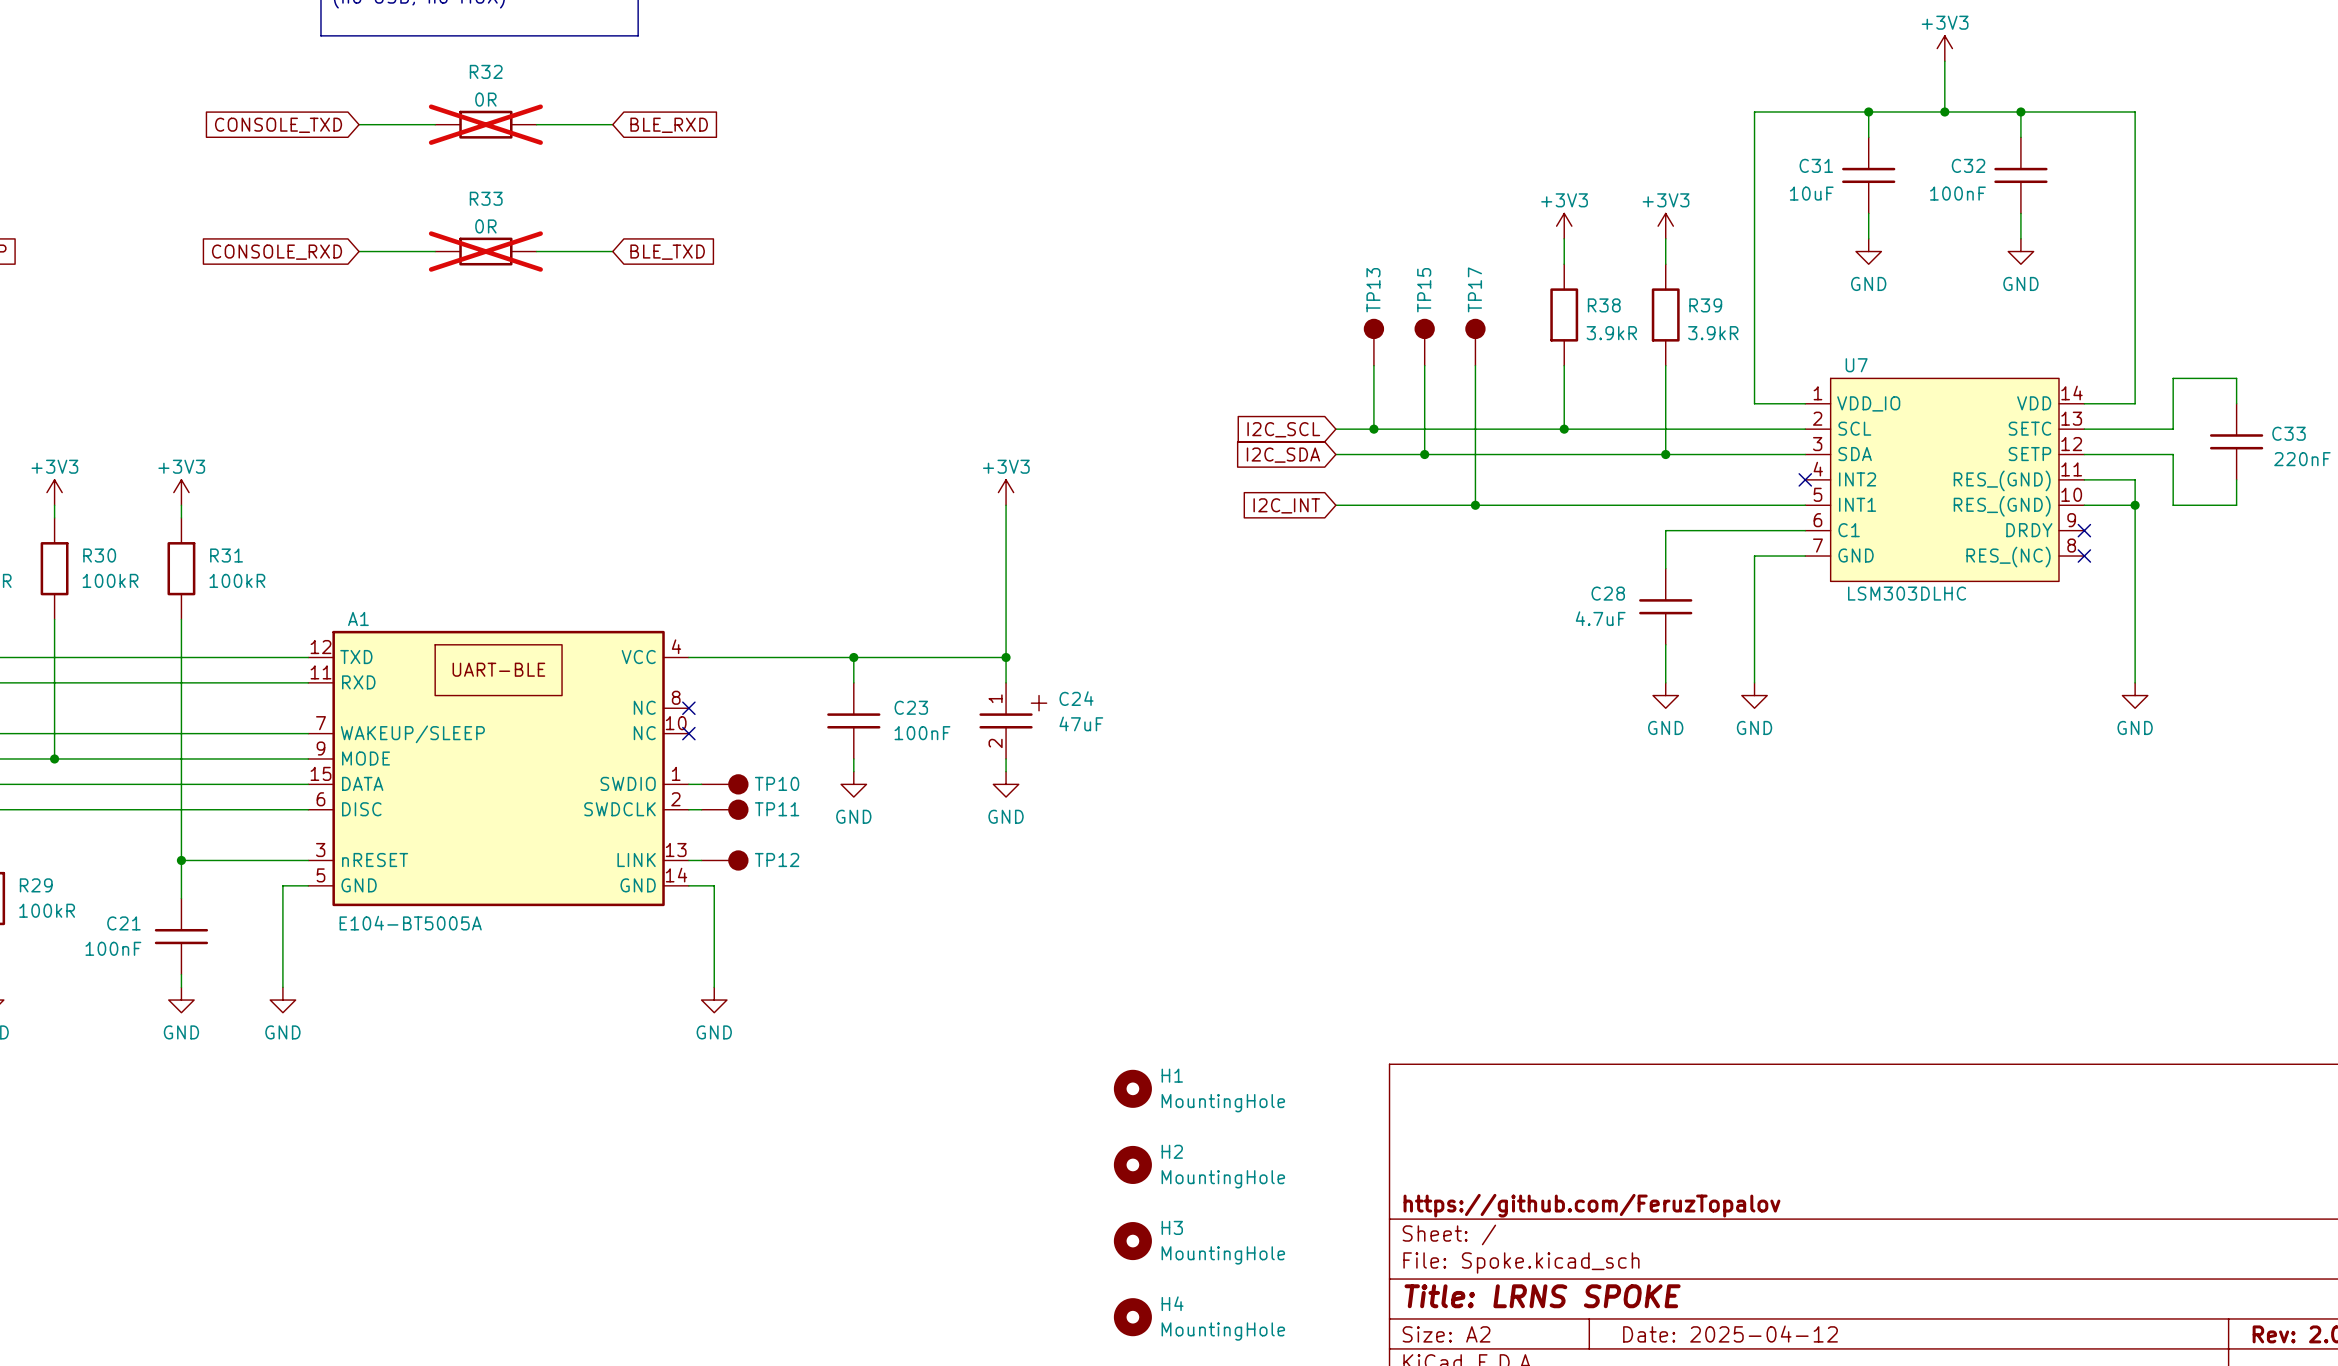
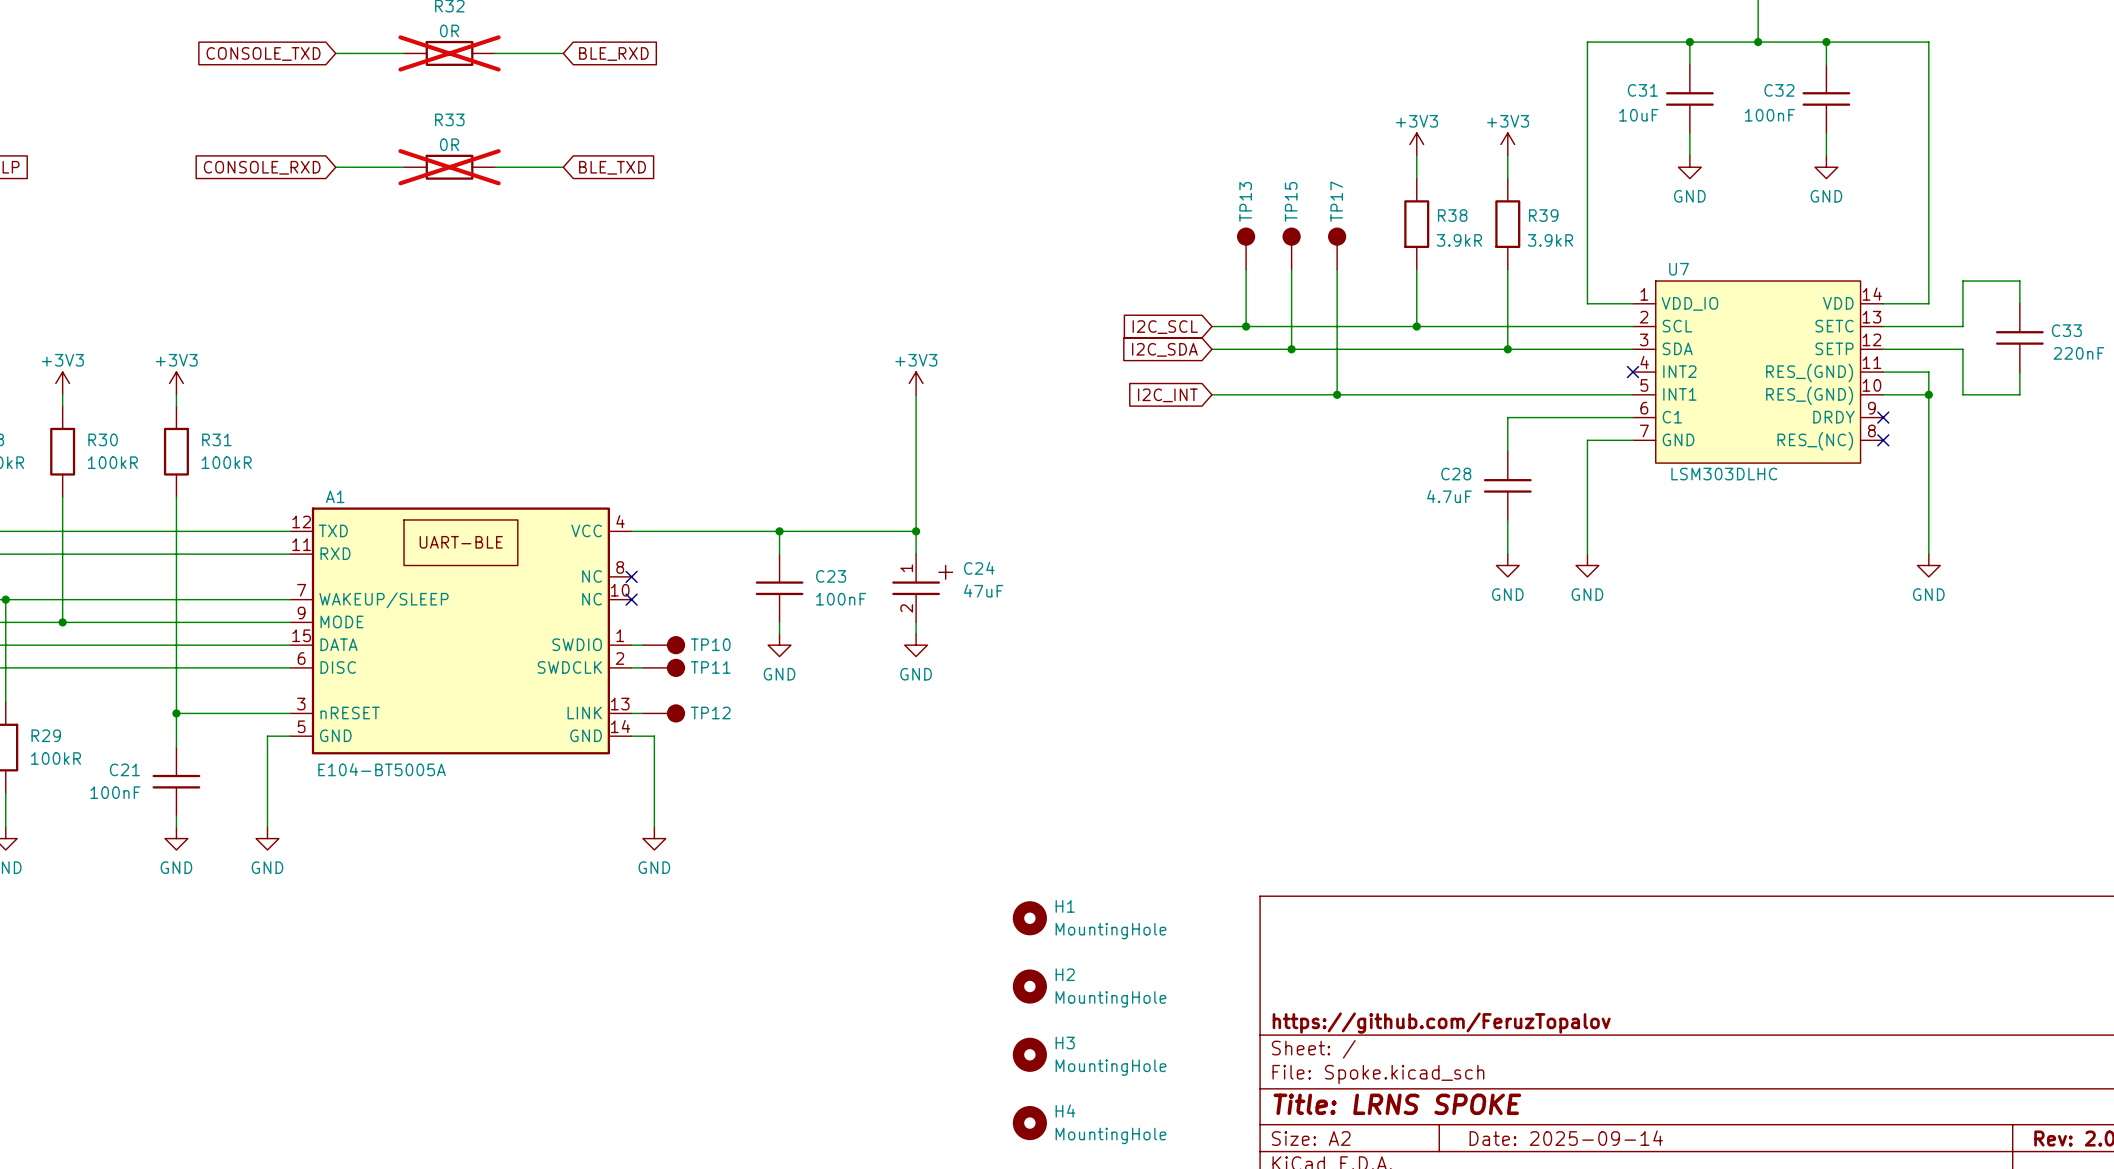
title block: Date: 2025-04-12 (1730, 1334) -> Date: 2025-09-14 (1566, 1138)

